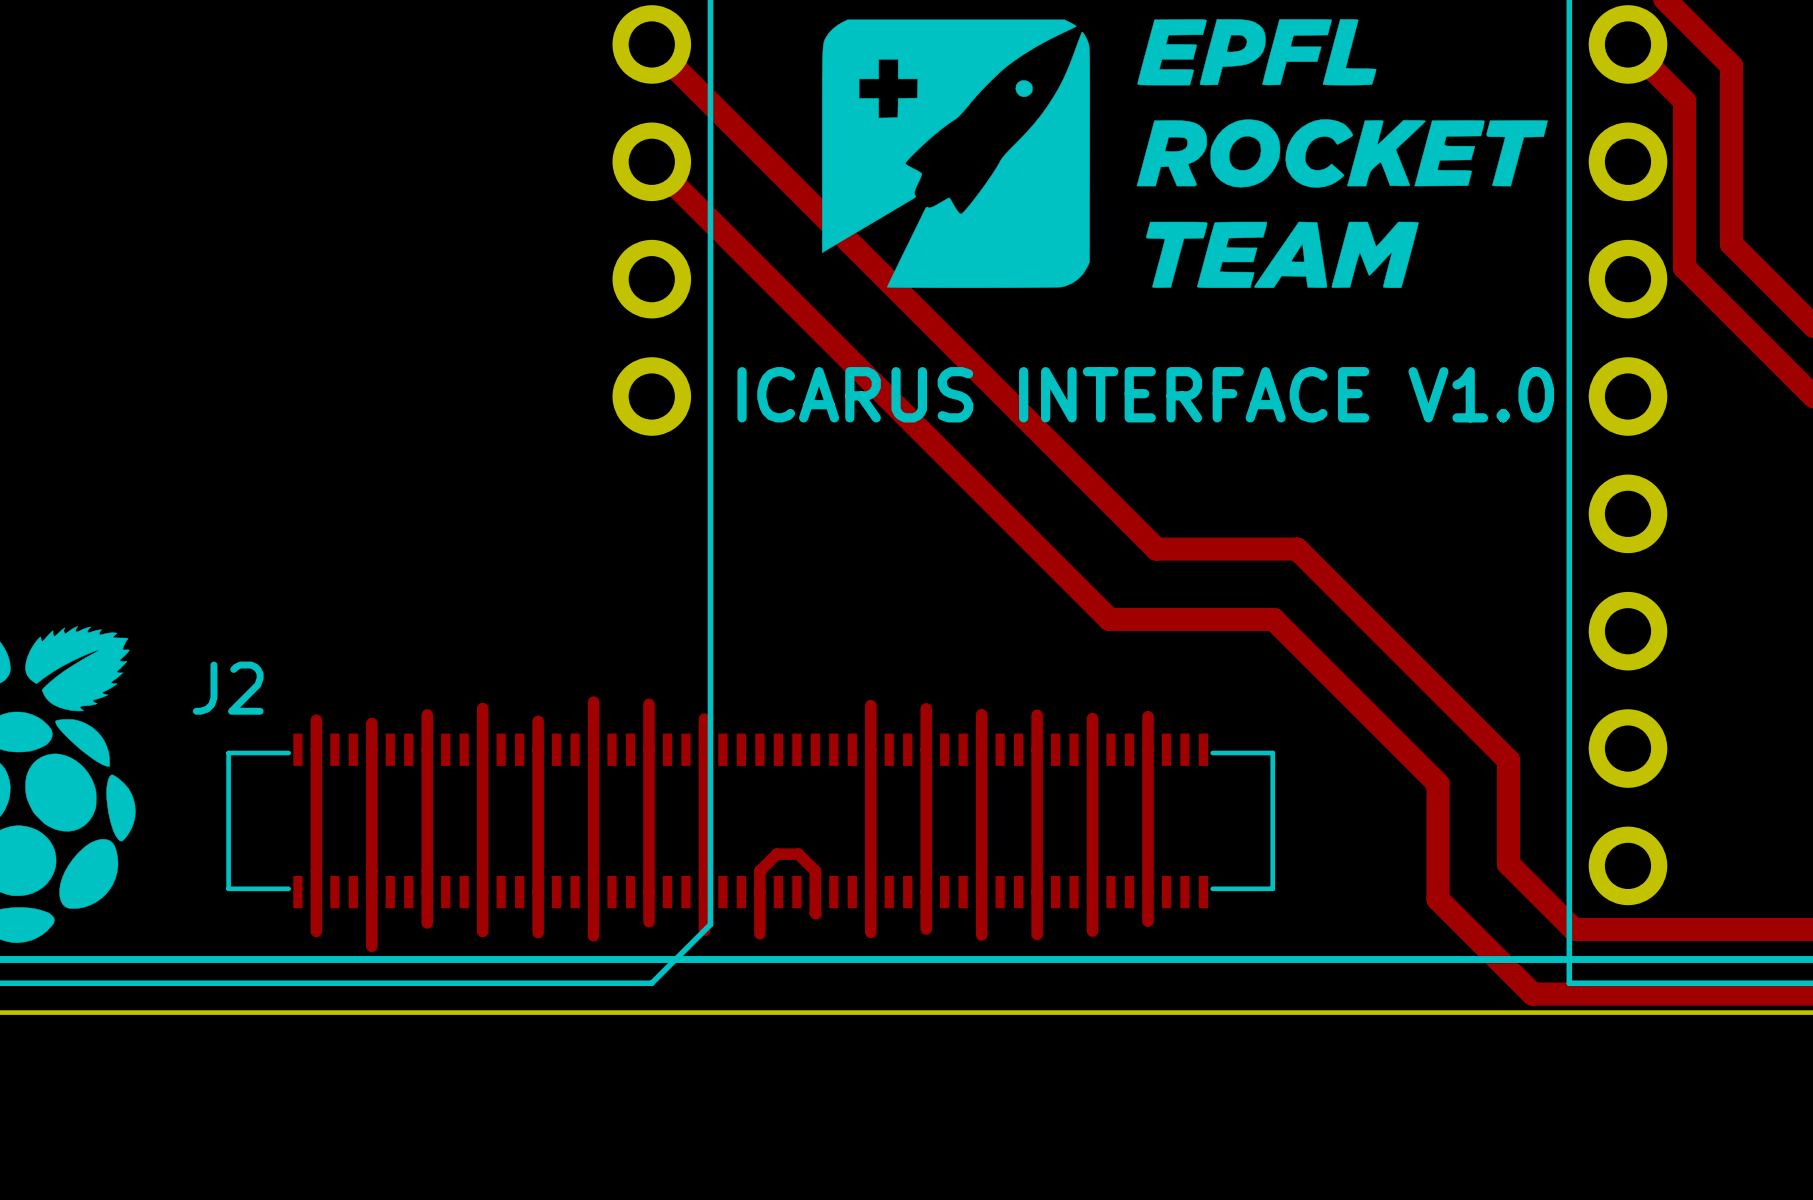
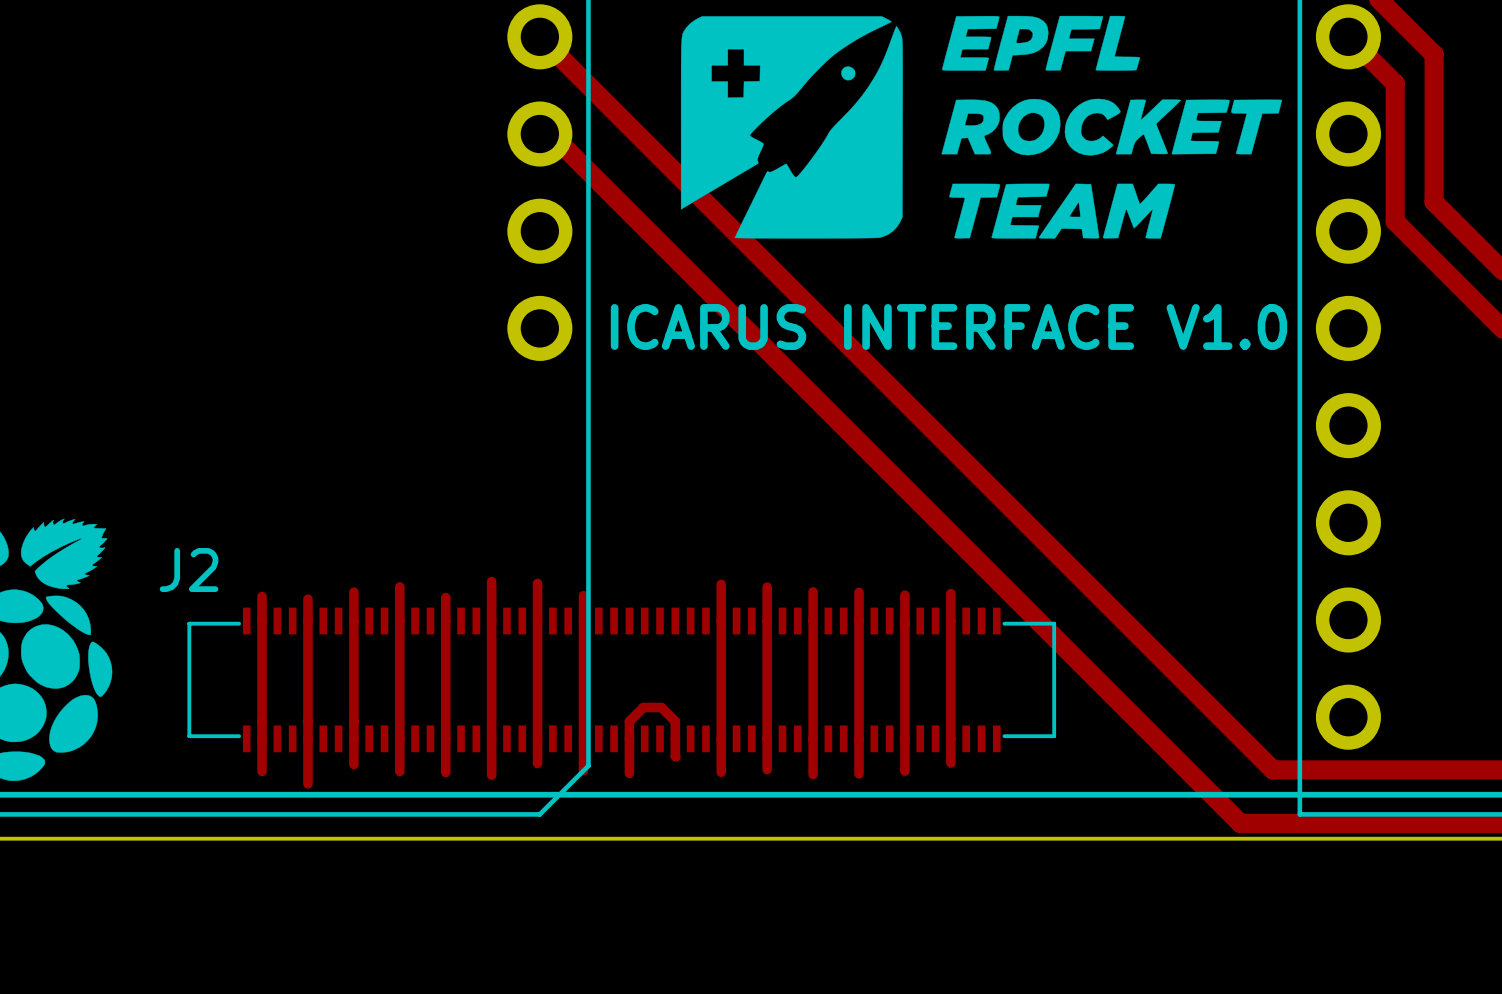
track: (651, 161) (1109, 619) (1273, 619) (1438, 783) (1438, 899) (1532, 994) -> (551, 134) (1240, 823) (1269, 823)
track: (1156, 549) (1297, 549) (1508, 760) (1508, 863) (1573, 929) -> (957, 454) (1272, 769) (1303, 769)

